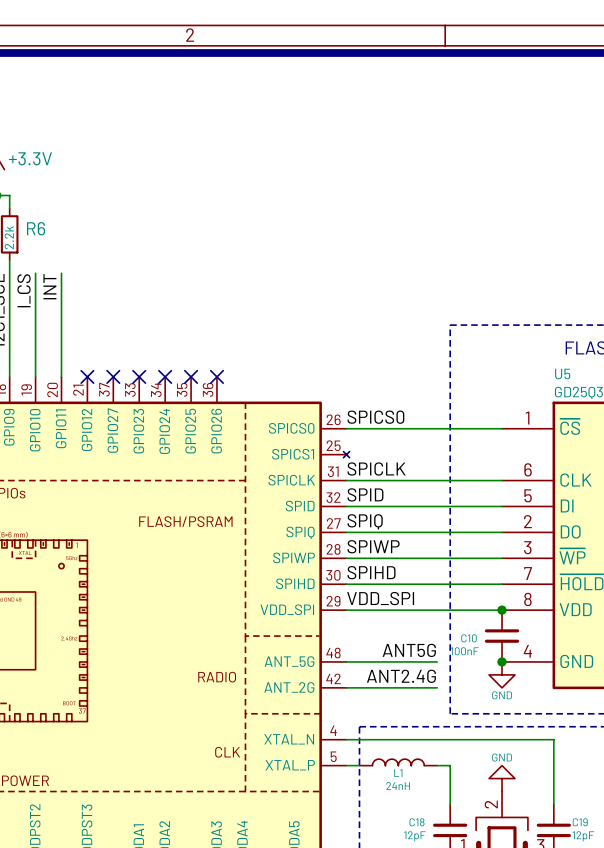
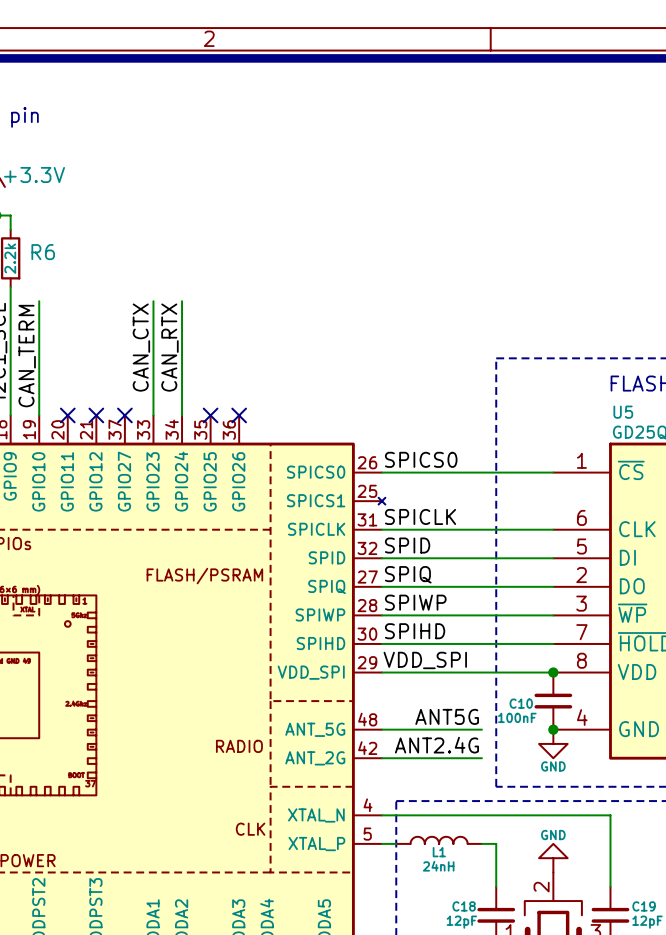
wire: (61, 273) (61, 376) -> (153, 301) (153, 415)
wire: none -> (182, 301) (182, 415)
label: INT (49, 286) -> none
label: I_CS (24, 290) -> CAN_TERM (27, 356)
label: none -> CAN_CTX (141, 347)
label: none -> CAN_RTX (169, 347)
no-connect mark: none -> (67, 415)
no-connect mark: (139, 376) -> none
no-connect mark: (165, 376) -> none

